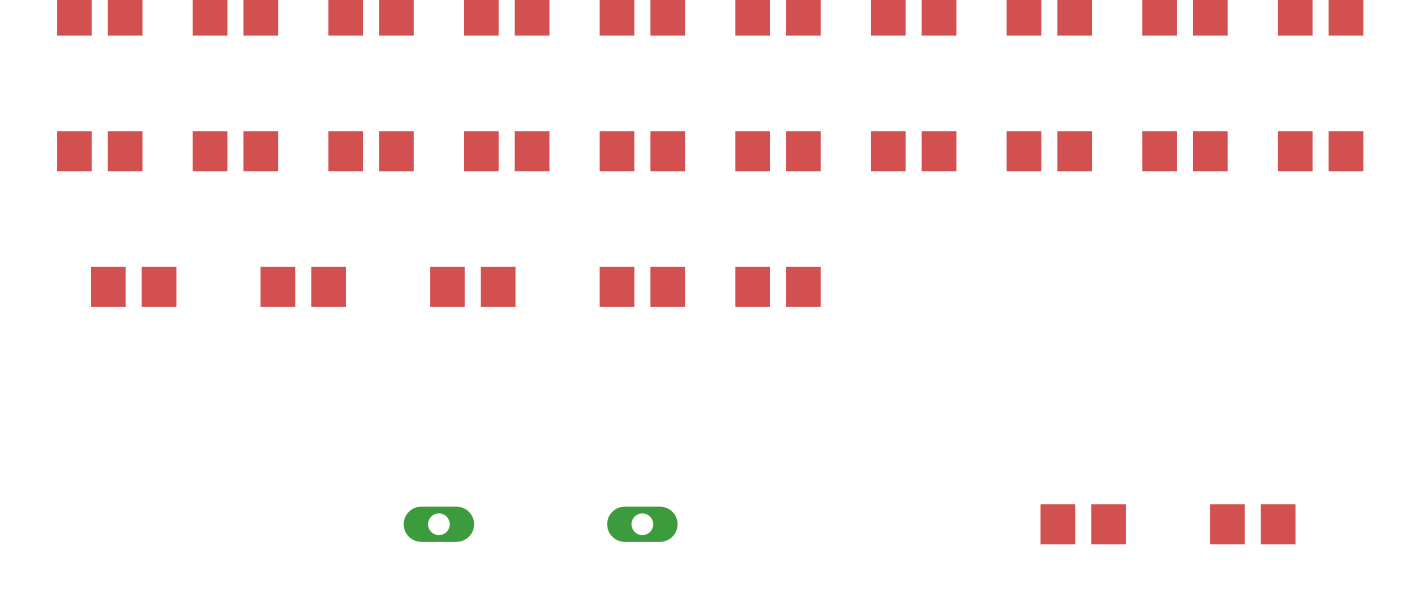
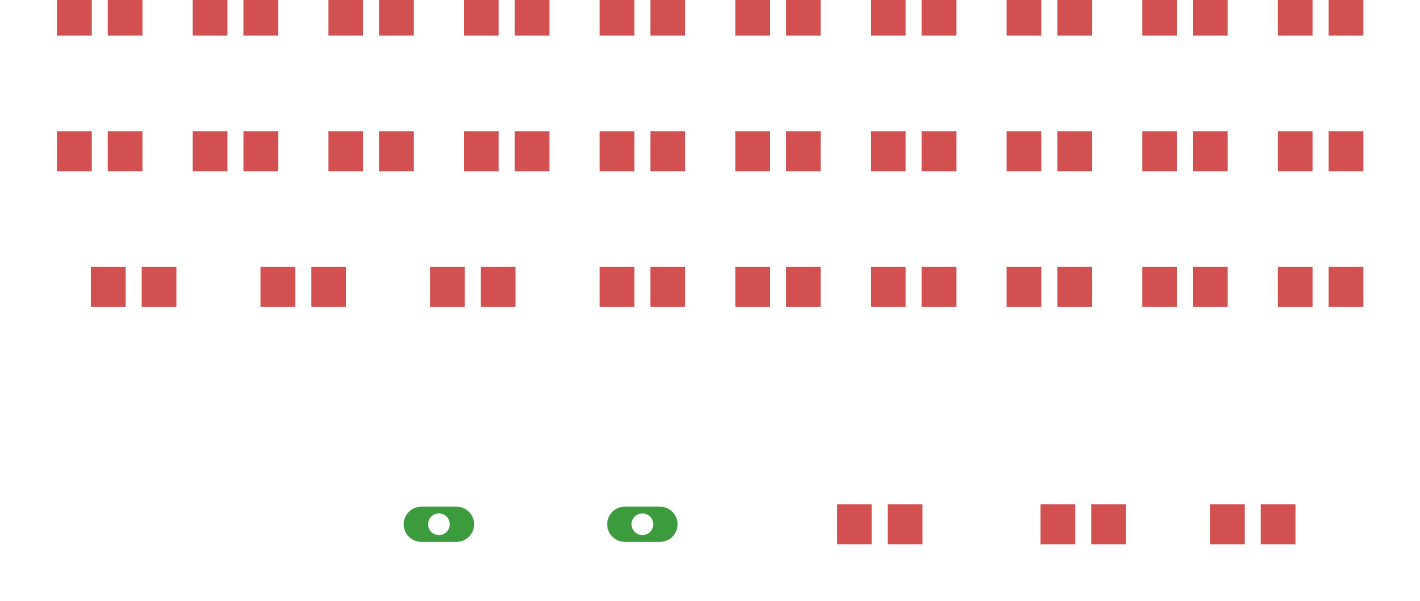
part: none -> (913, 286)
part: none -> (1049, 286)
part: none -> (1184, 286)
part: none -> (1320, 286)
part: none -> (879, 524)

